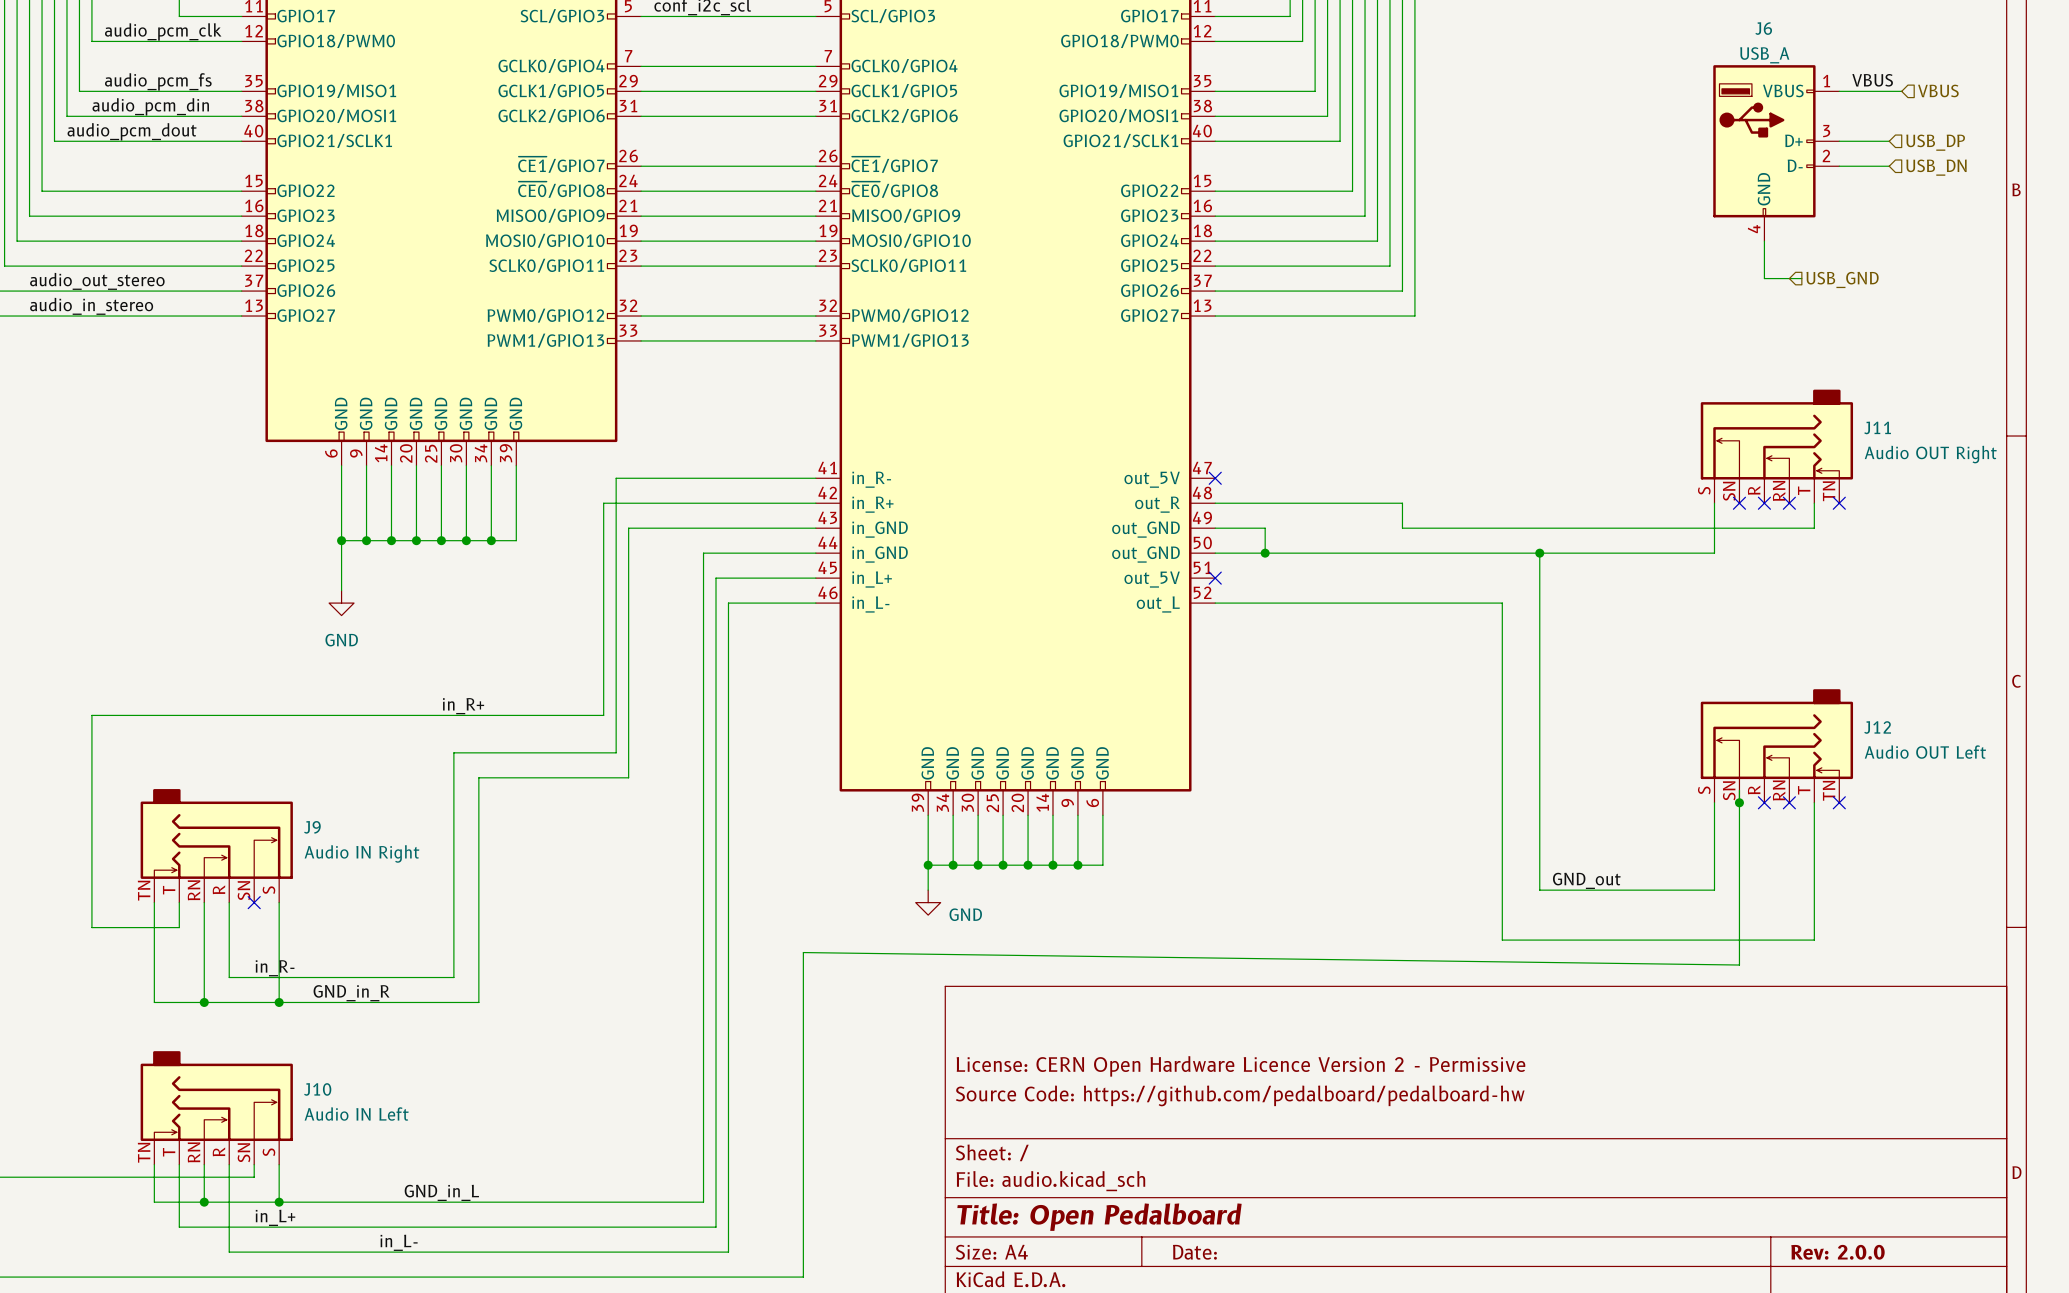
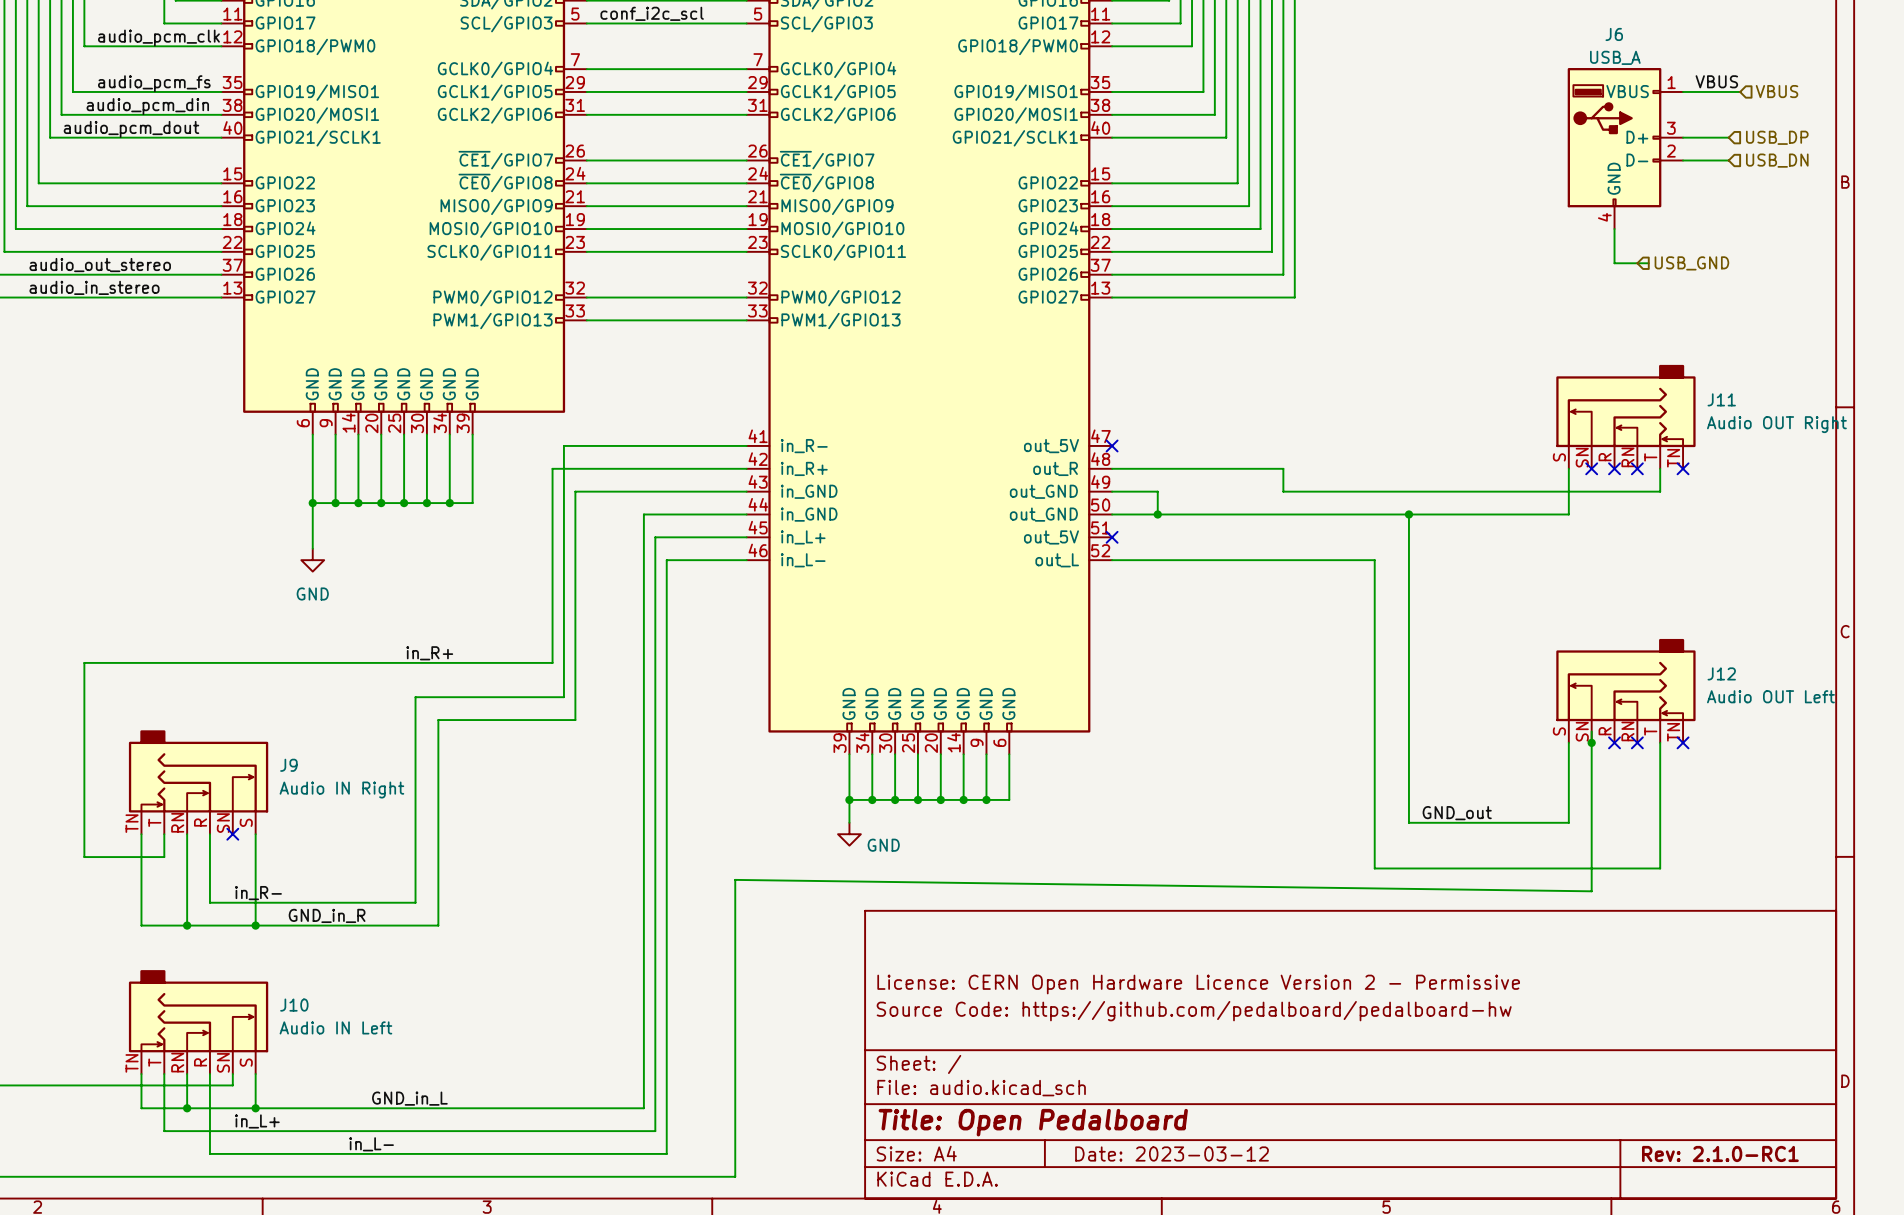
title block: Date: (1194, 1252) -> Date: 2023-03-12 (1172, 1153)
title block: Rev: 2.0.0 (1837, 1252) -> Rev: 2.1.0-RC1 (1720, 1153)

